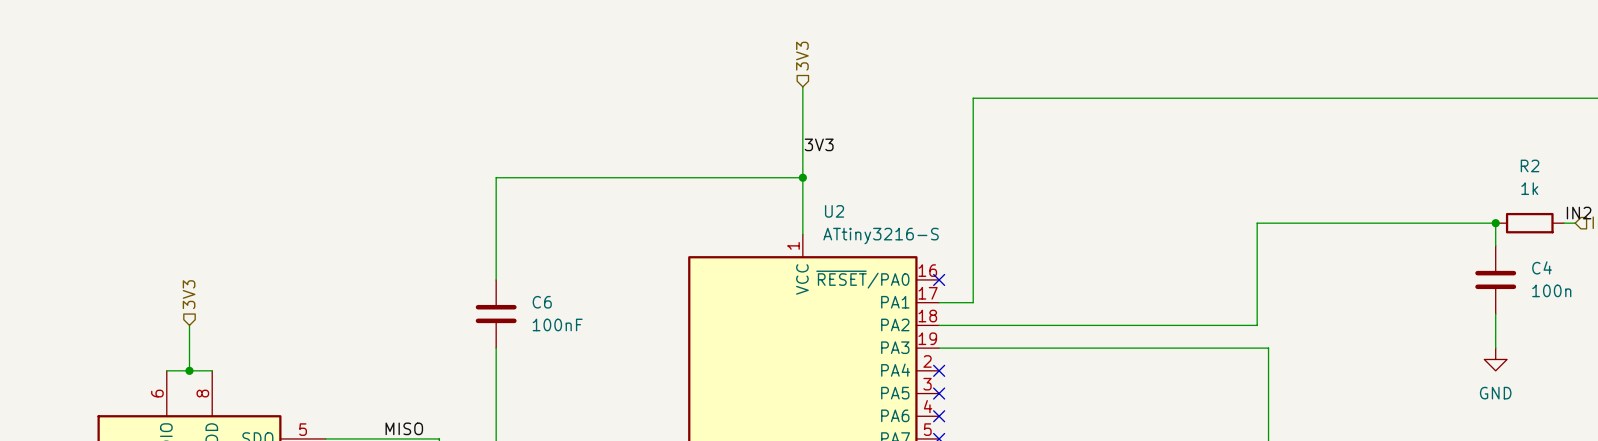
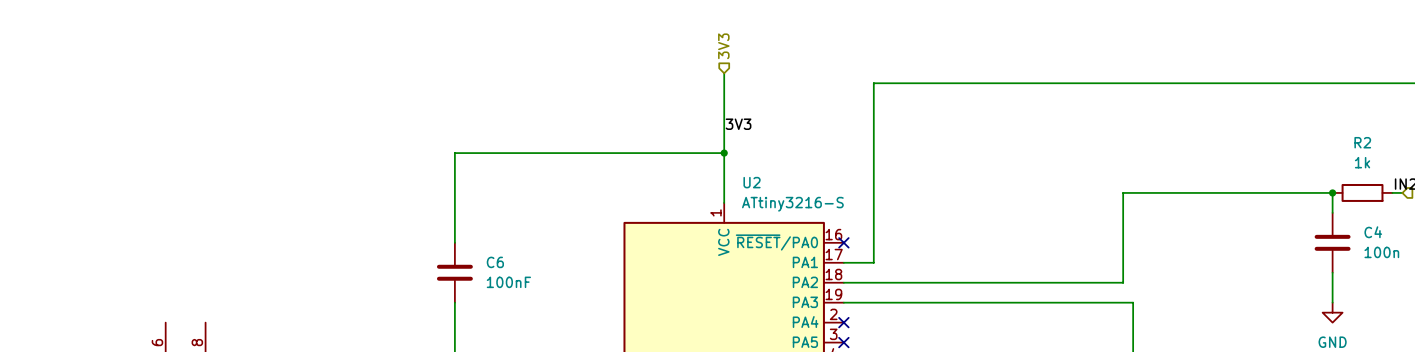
hierarchical label: 3V3 (189, 294) -> none
wire: (189, 325) (189, 370) -> none
wire: (166, 370) (212, 370) -> none
junction: (189, 370) -> none

